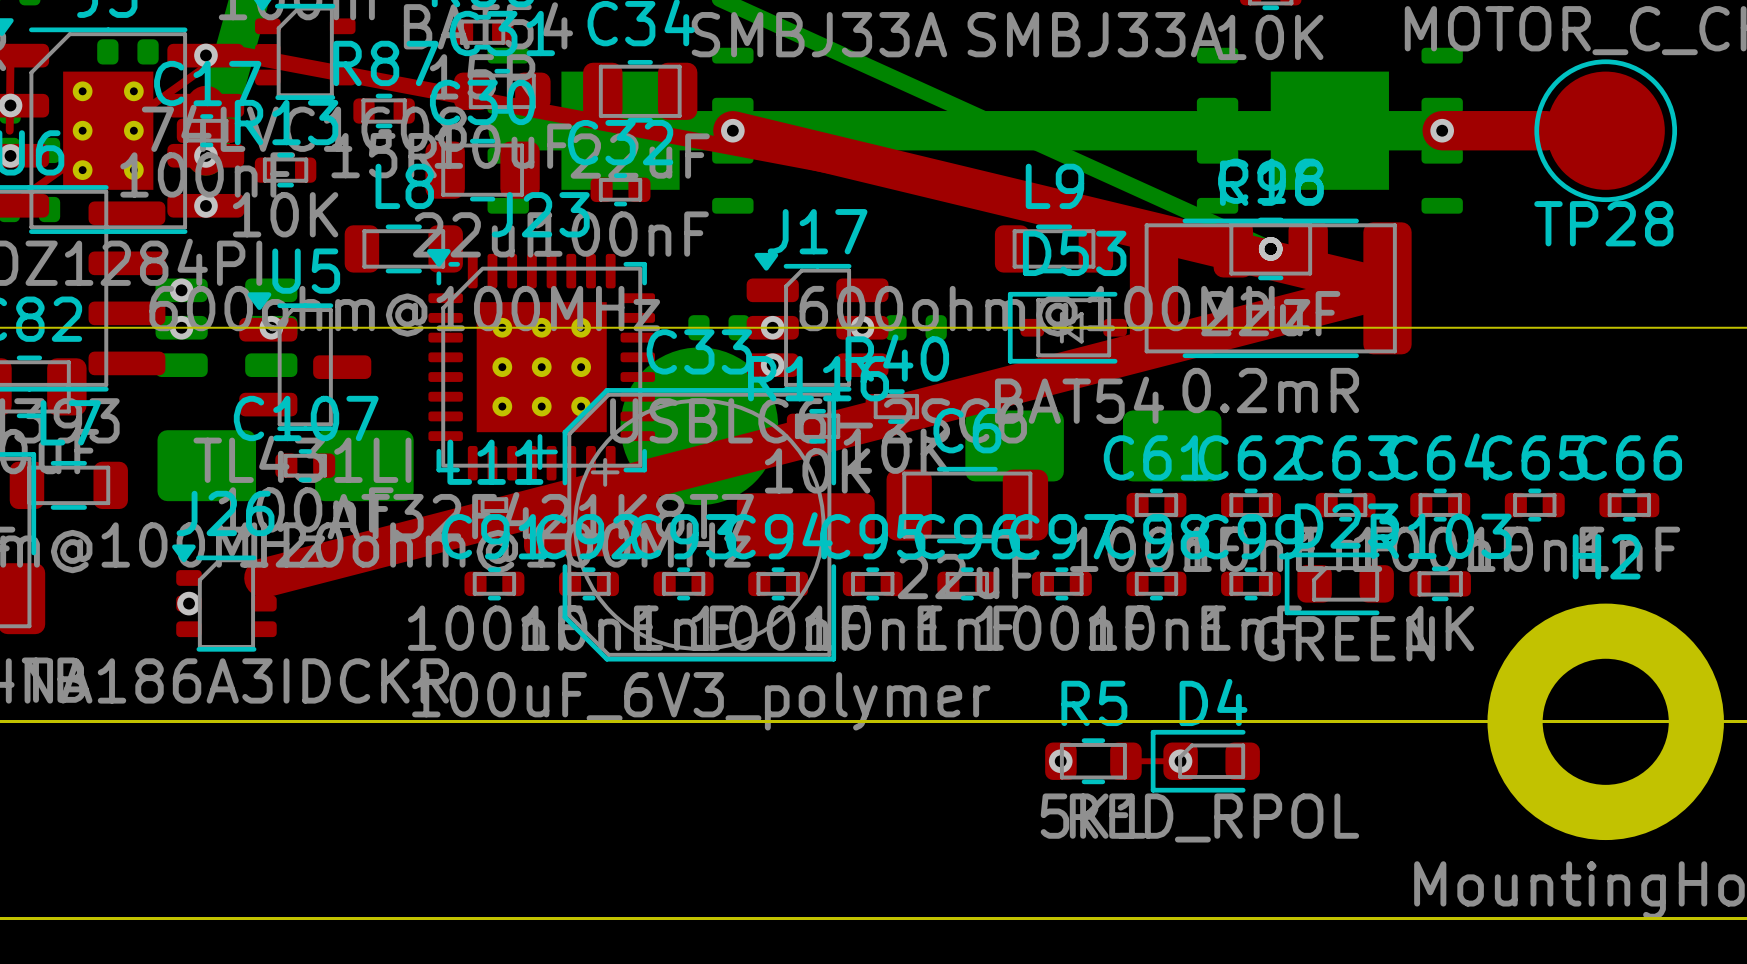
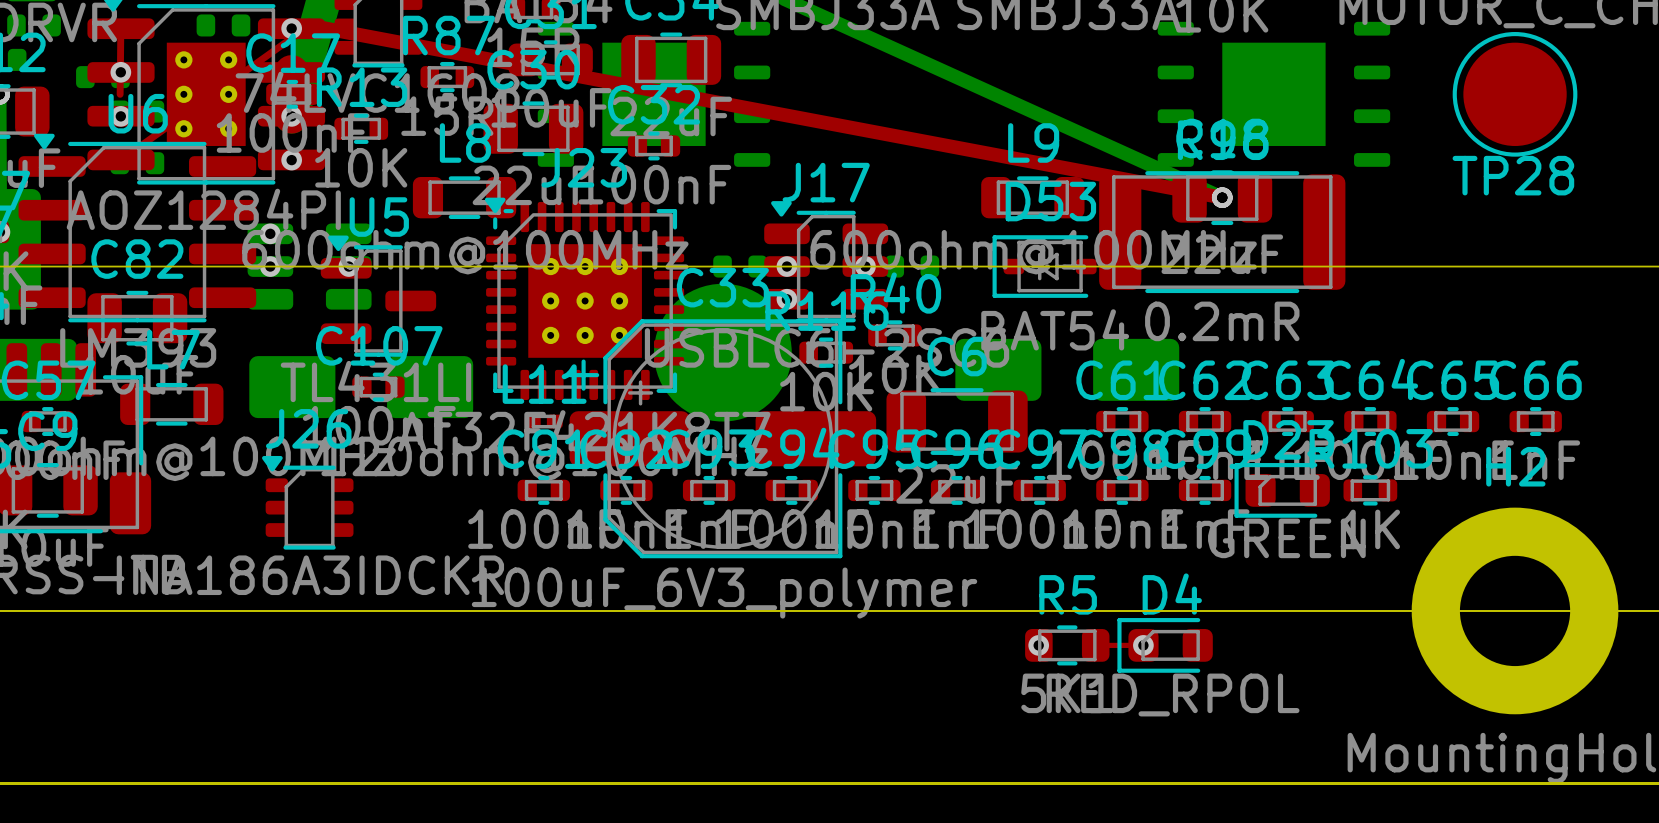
bottom track: (508, 130) (1442, 130) -> none
top track: (732, 130) (1387, 288) (263, 577) -> none
via: (732, 130) -> none
top track: (1442, 130) (1546, 130) -> none
via: (1442, 130) -> none
via: (189, 603) -> none

